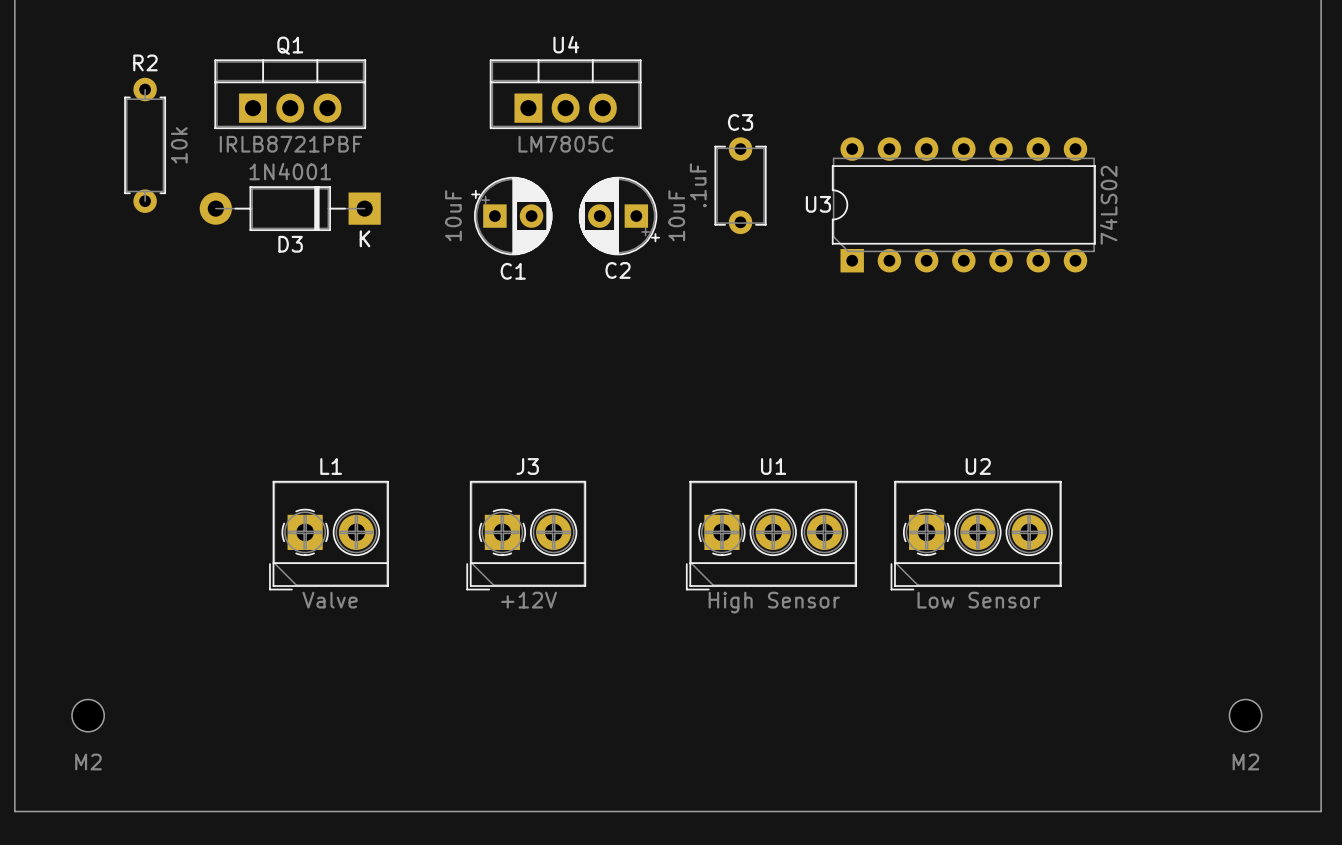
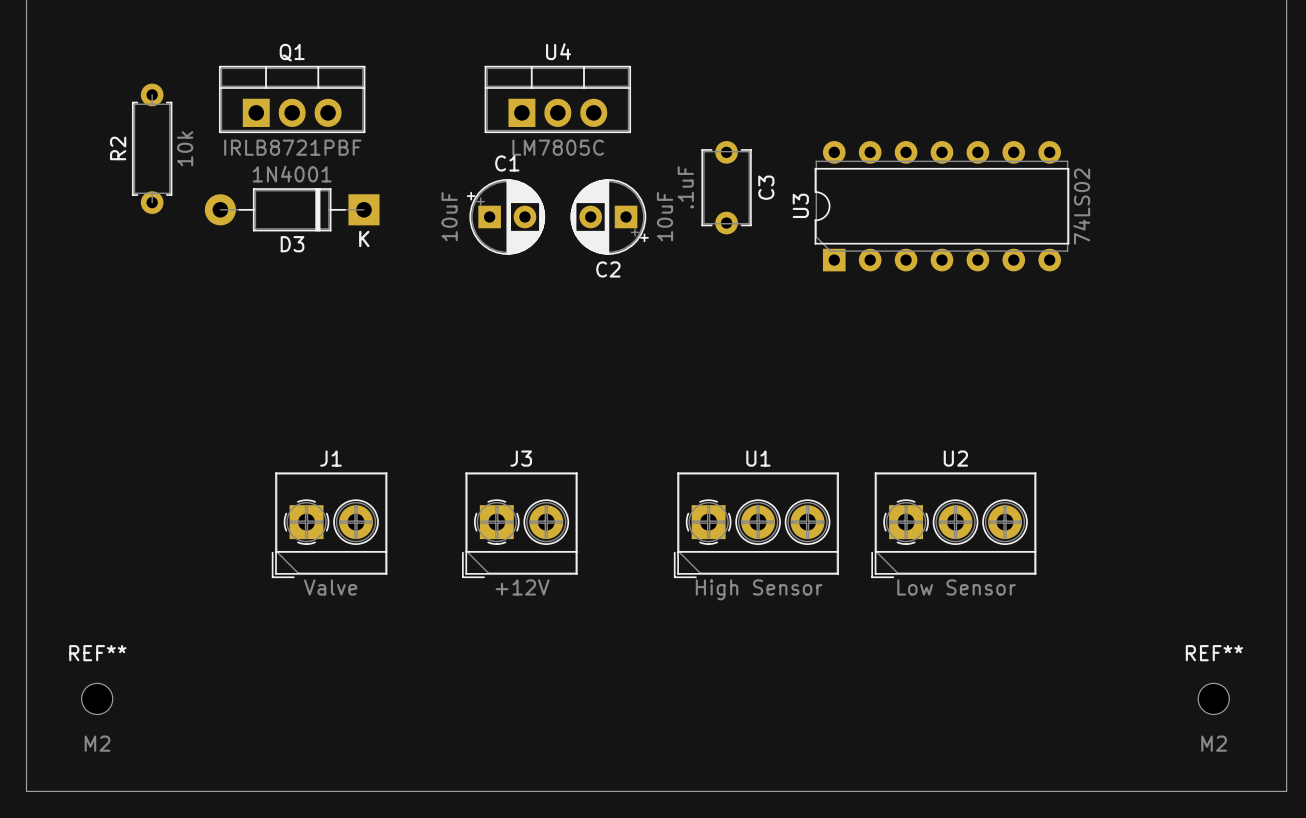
R2 name rotation: 0° (145, 62) -> 90° counterclockwise (118, 148)
R2 name position: R2 (145, 62) -> R2 (118, 148)
C3 name rotation: 0° (740, 122) -> 90° counterclockwise (766, 187)
C3 name position: C3 (740, 122) -> C3 (766, 187)
U3 name rotation: 0° (818, 204) -> 90° counterclockwise (800, 205)
C1 name position: C1 (513, 271) -> C1 (507, 163)
L1 name: L1 (331, 466) -> J1 (330, 458)
REF** name: none -> REF** (97, 653)
REF** name: none -> REF** (1214, 653)

